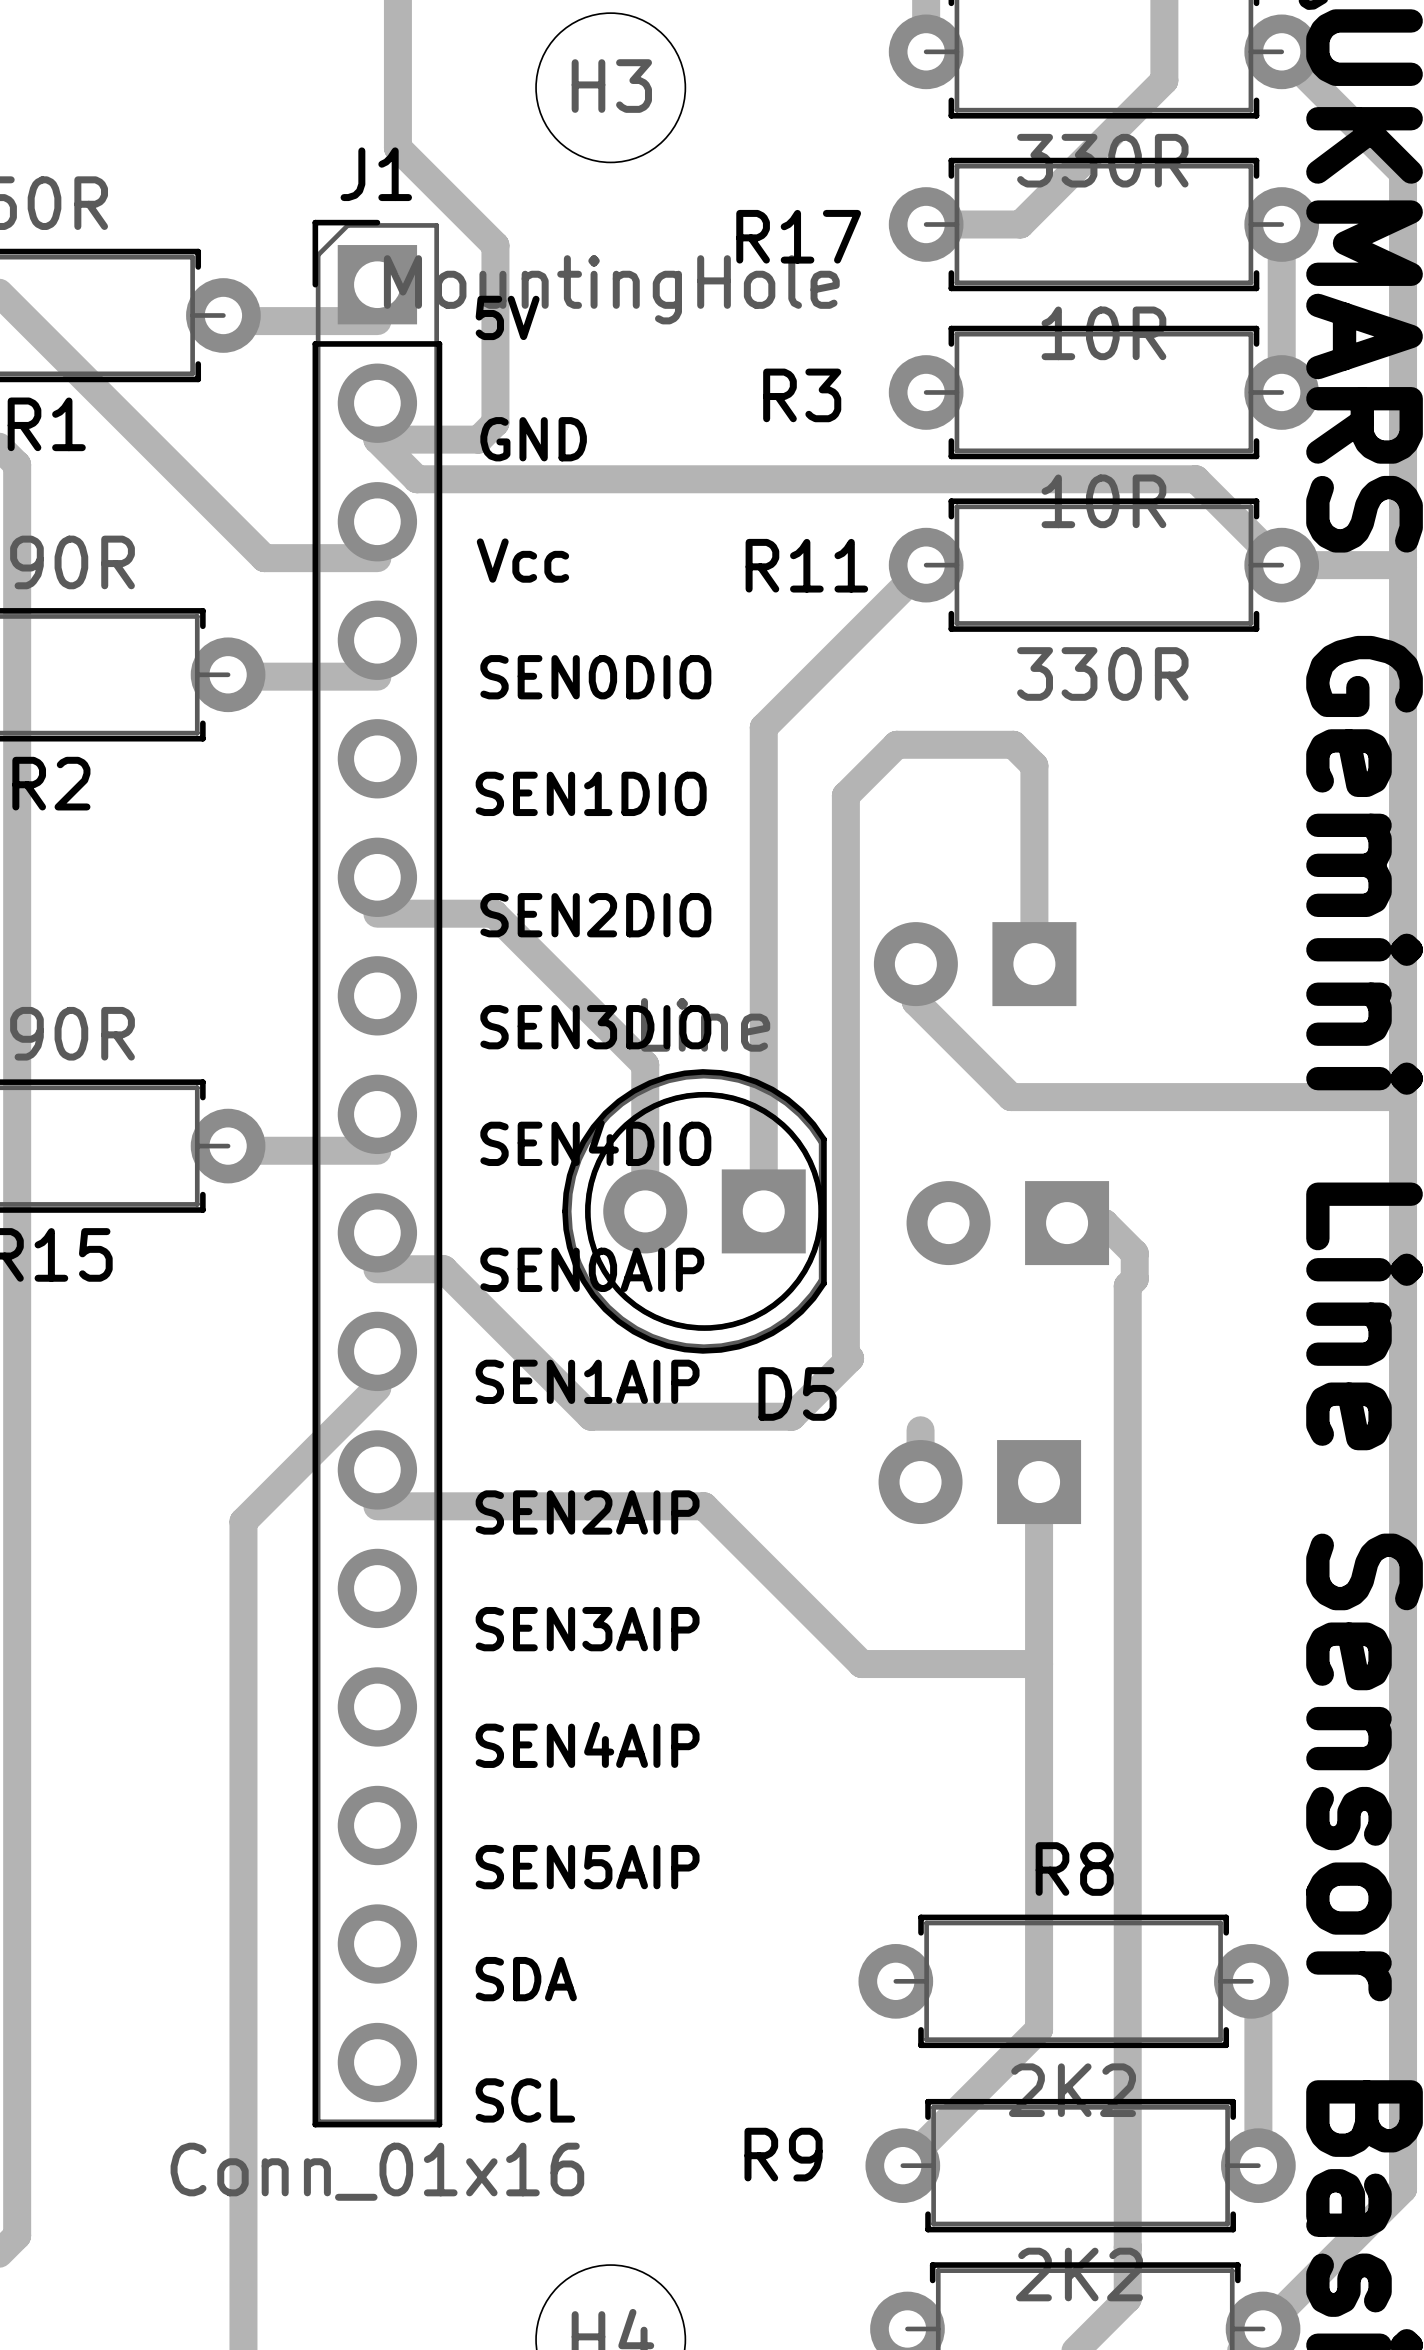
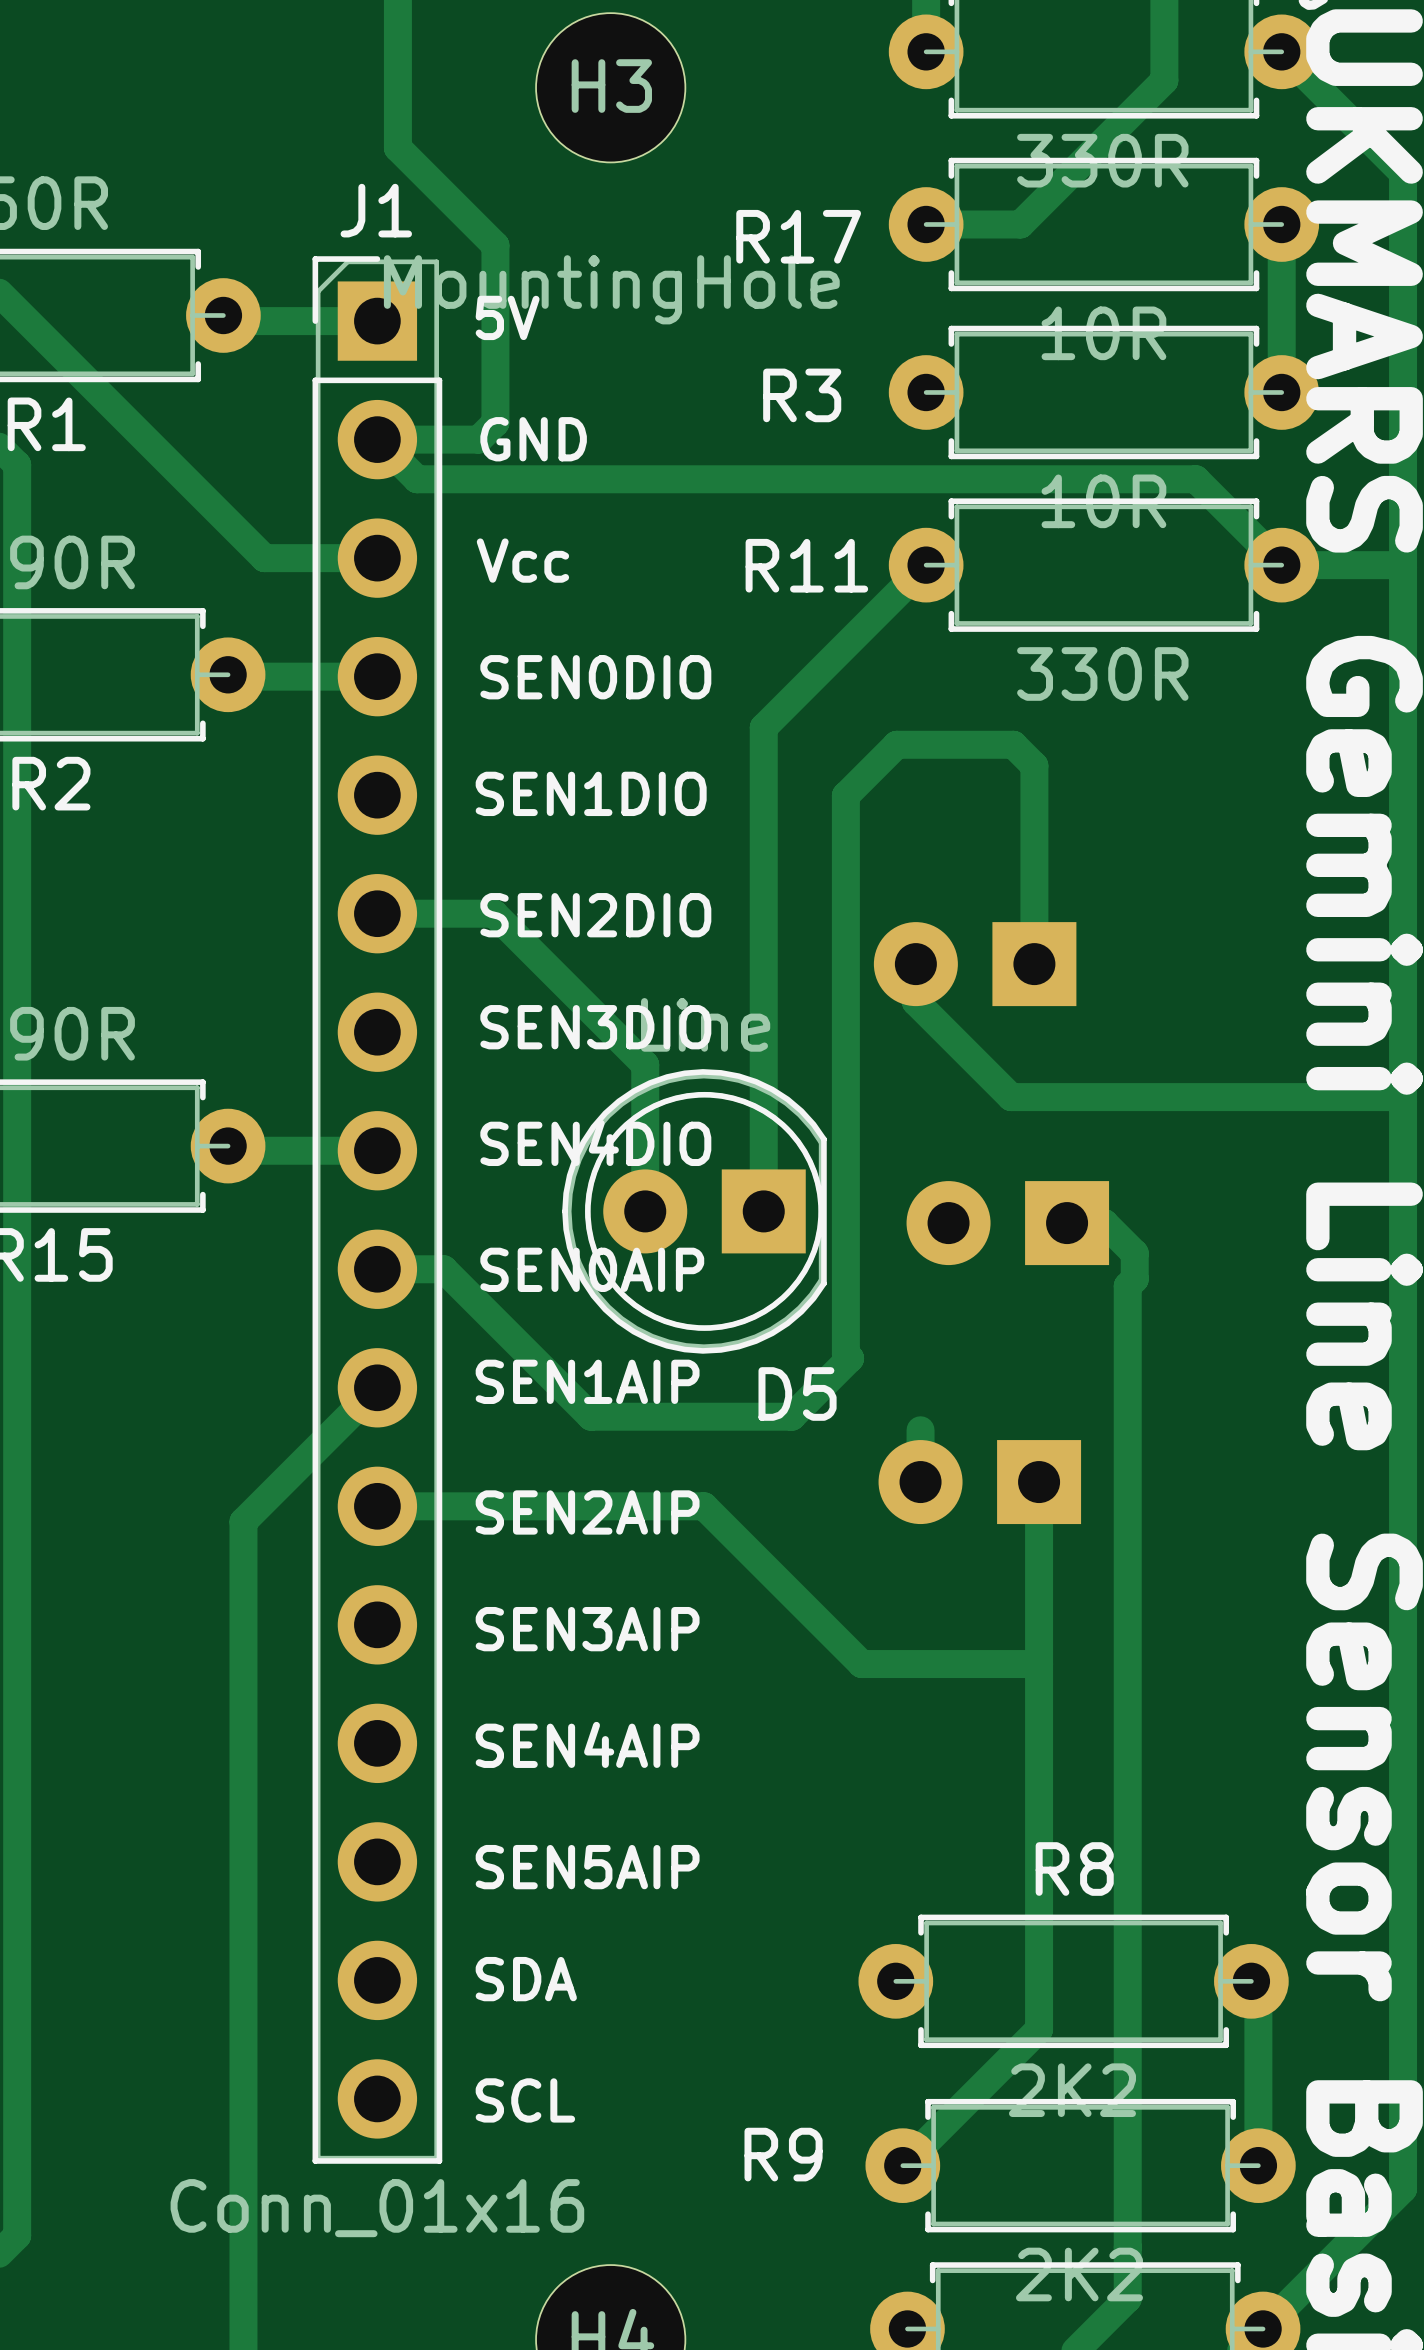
J1 position: (377, 1173) -> (377, 1210)

